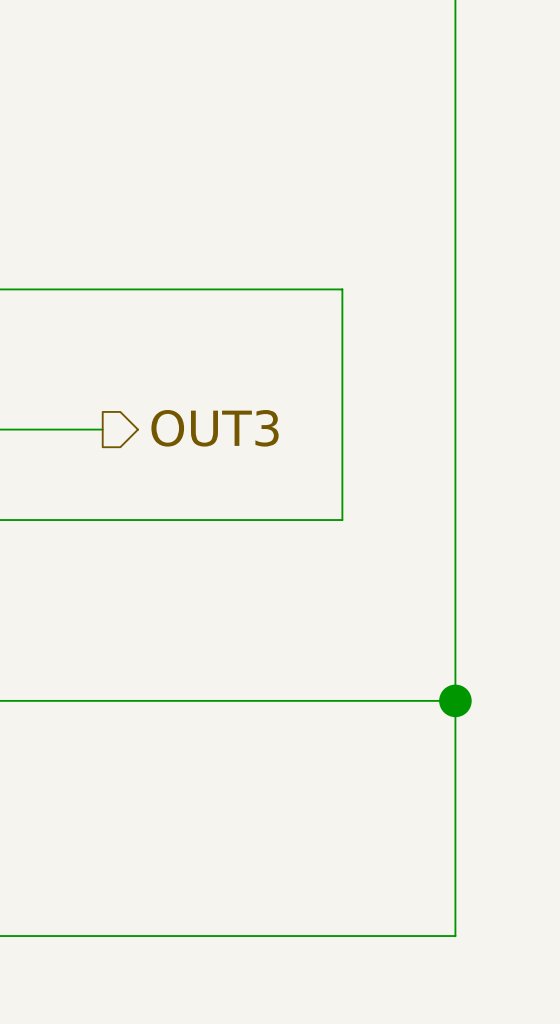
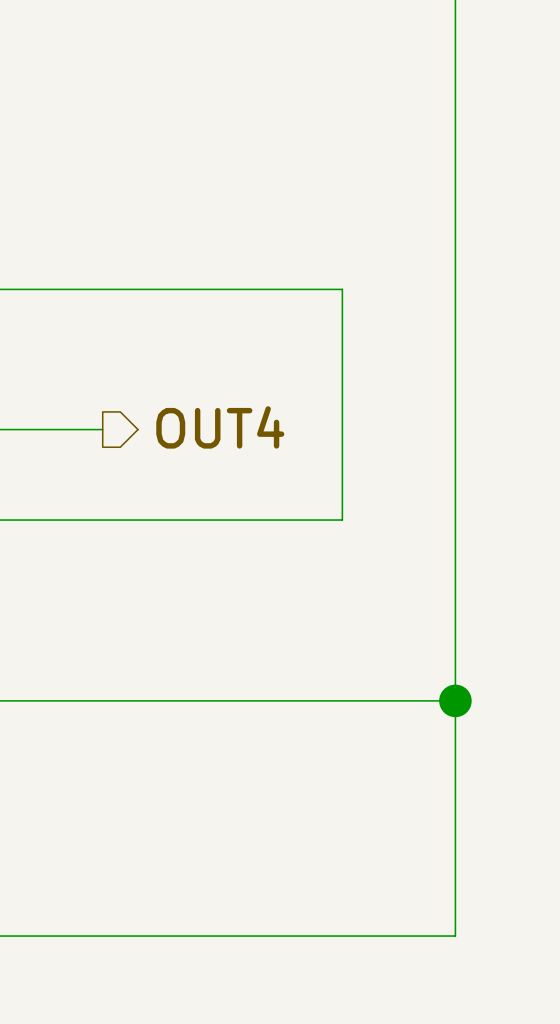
hierarchical label: OUT3 (215, 428) -> OUT4 (220, 427)

